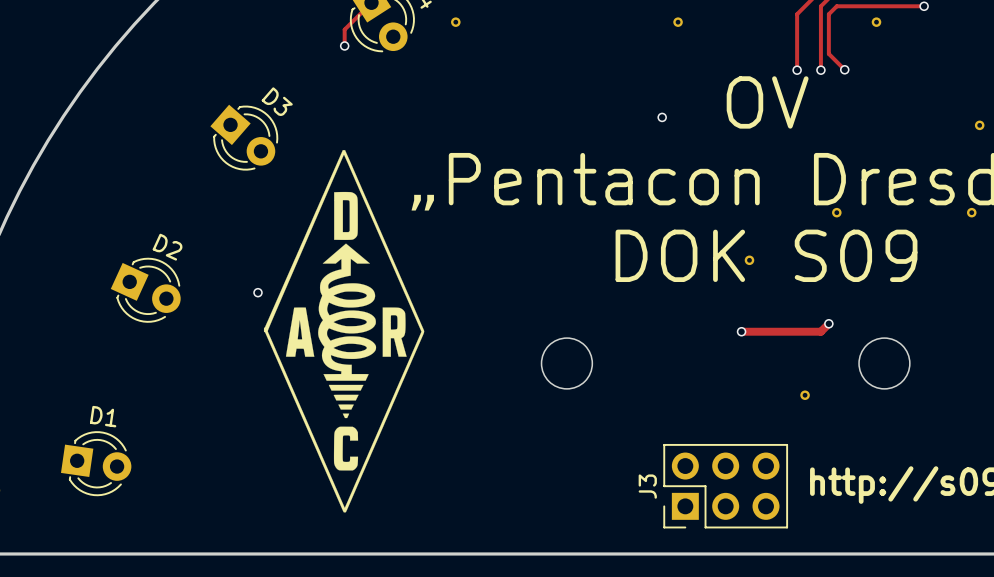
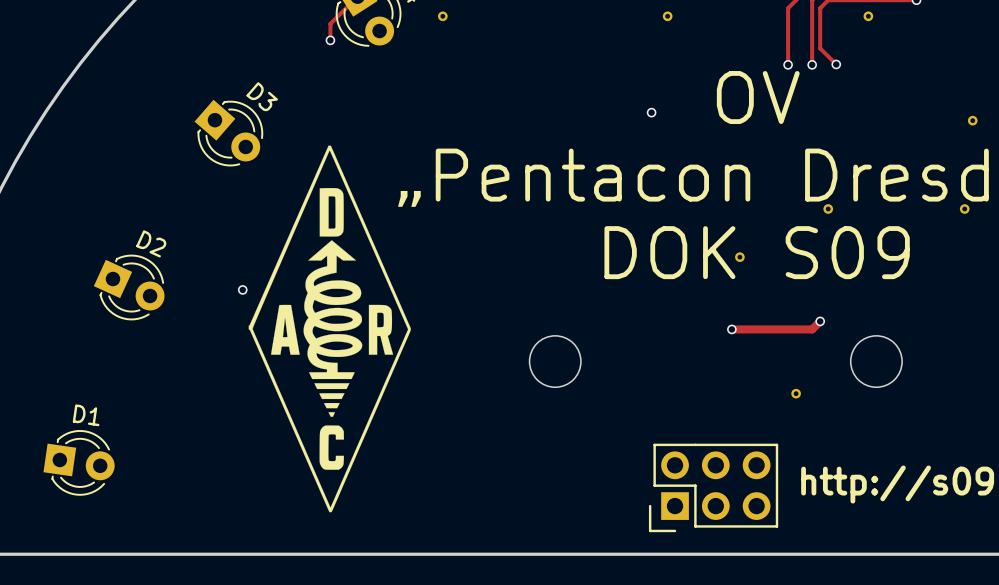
J3: (725, 486) -> none
part: none -> (713, 487)

